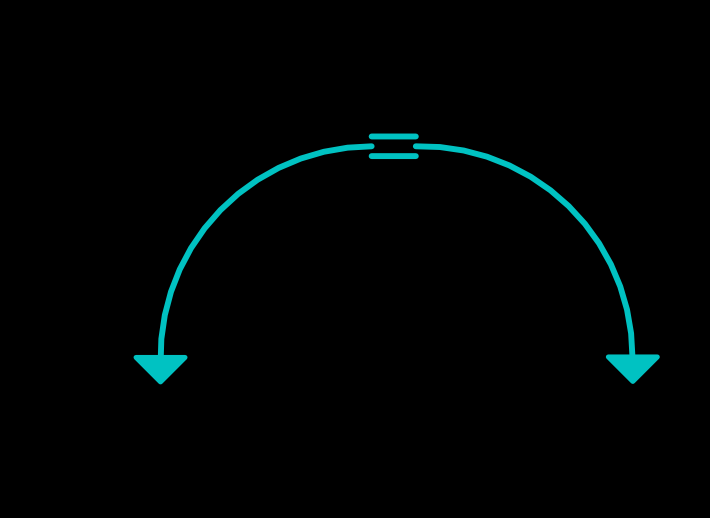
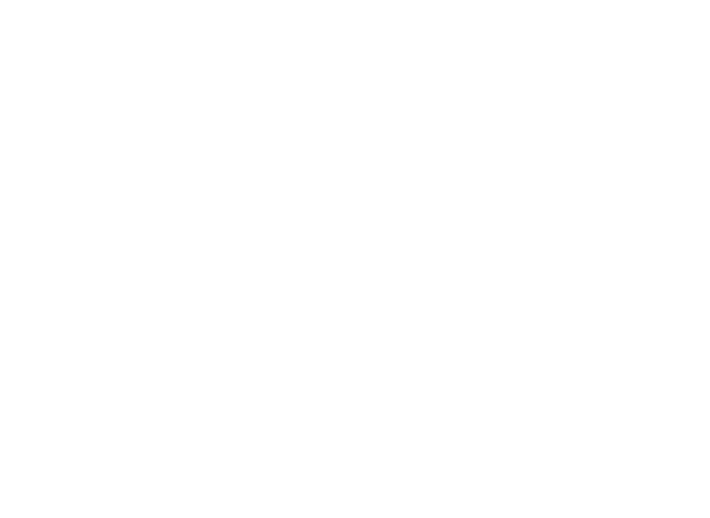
line: (371, 136) (415, 136) -> none
line: (371, 146) (347, 147) (300, 158) (257, 179) (220, 210) (191, 248) (170, 291) (161, 338) (160, 362) -> none
line: (415, 146) (463, 150) (509, 165) (530, 176) (568, 206) (599, 243) (620, 286) (631, 333) (632, 357) -> none
line: (371, 156) (415, 156) -> none
drawing: [133, 354, 188, 385] -> none
drawing: [605, 354, 660, 384] -> none

